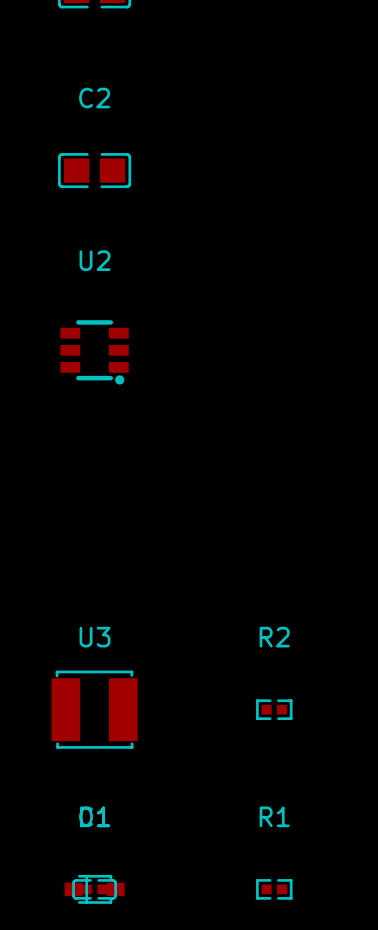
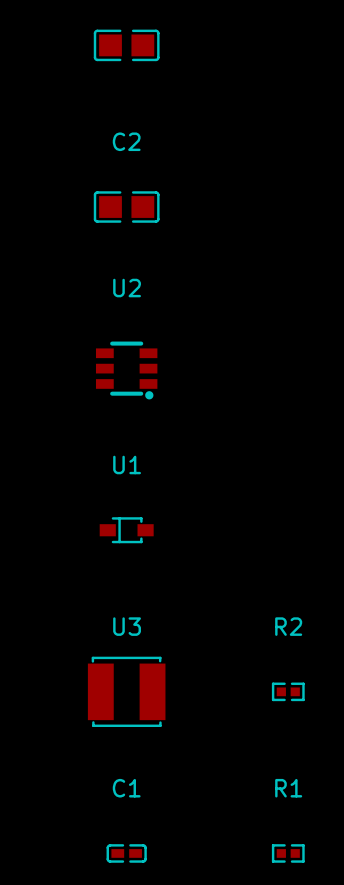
U1: none -> (126, 530)
part: (94, 889) -> none

